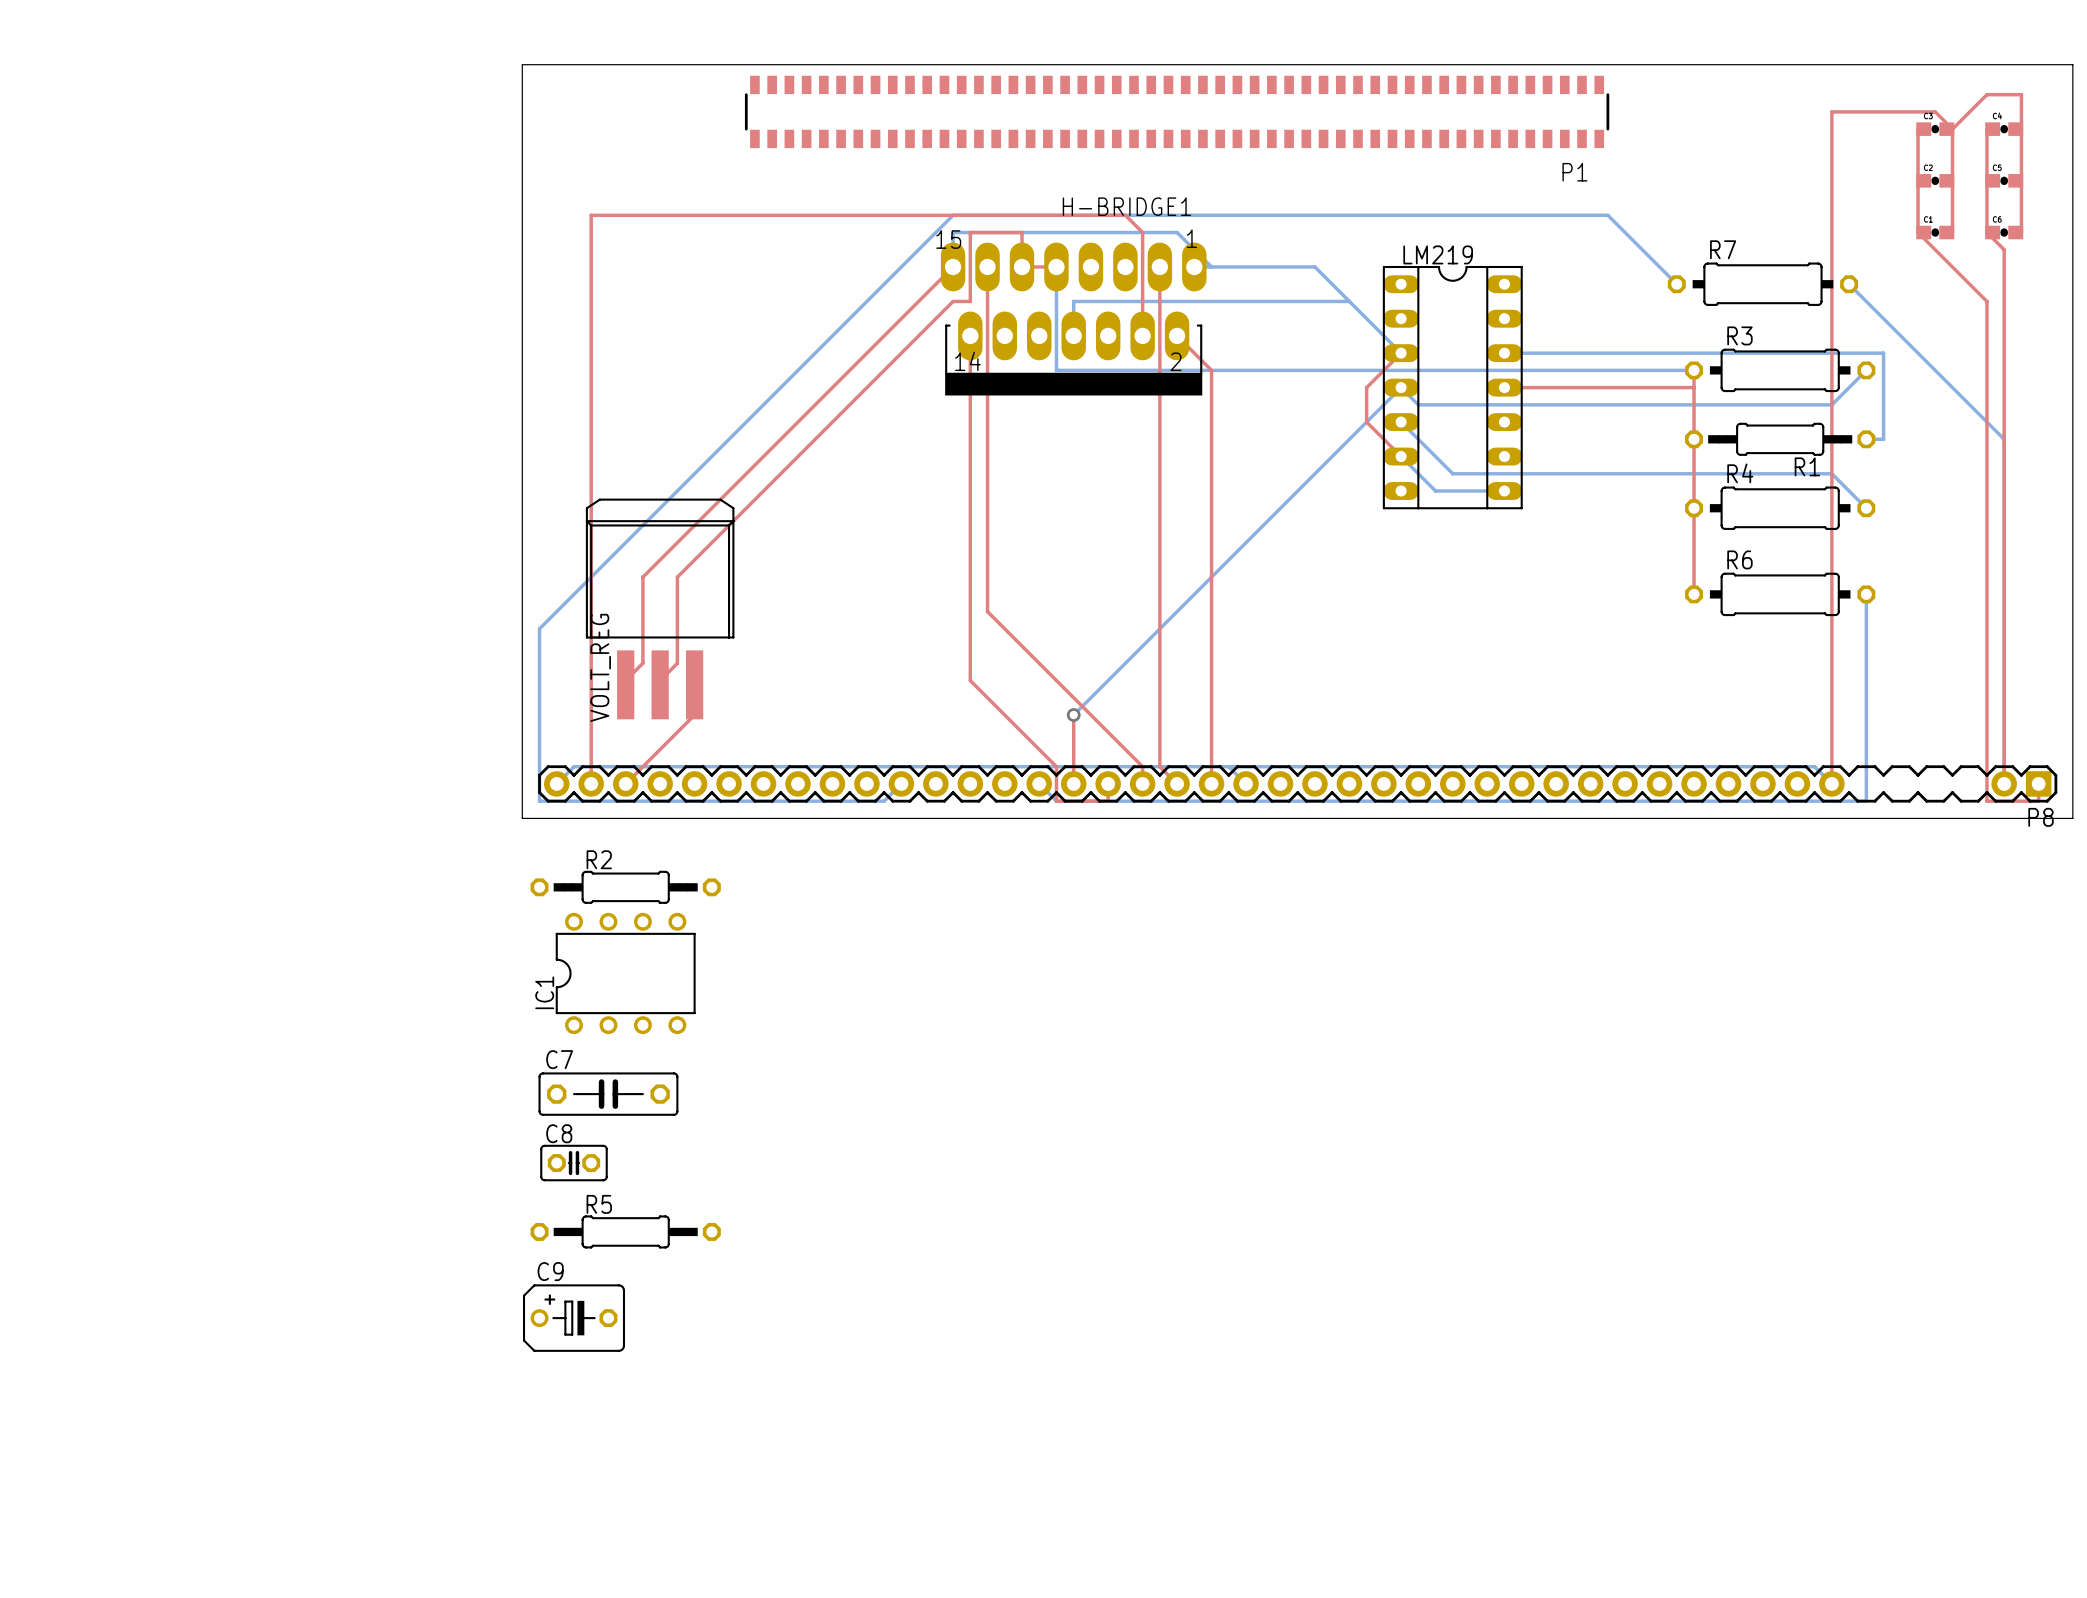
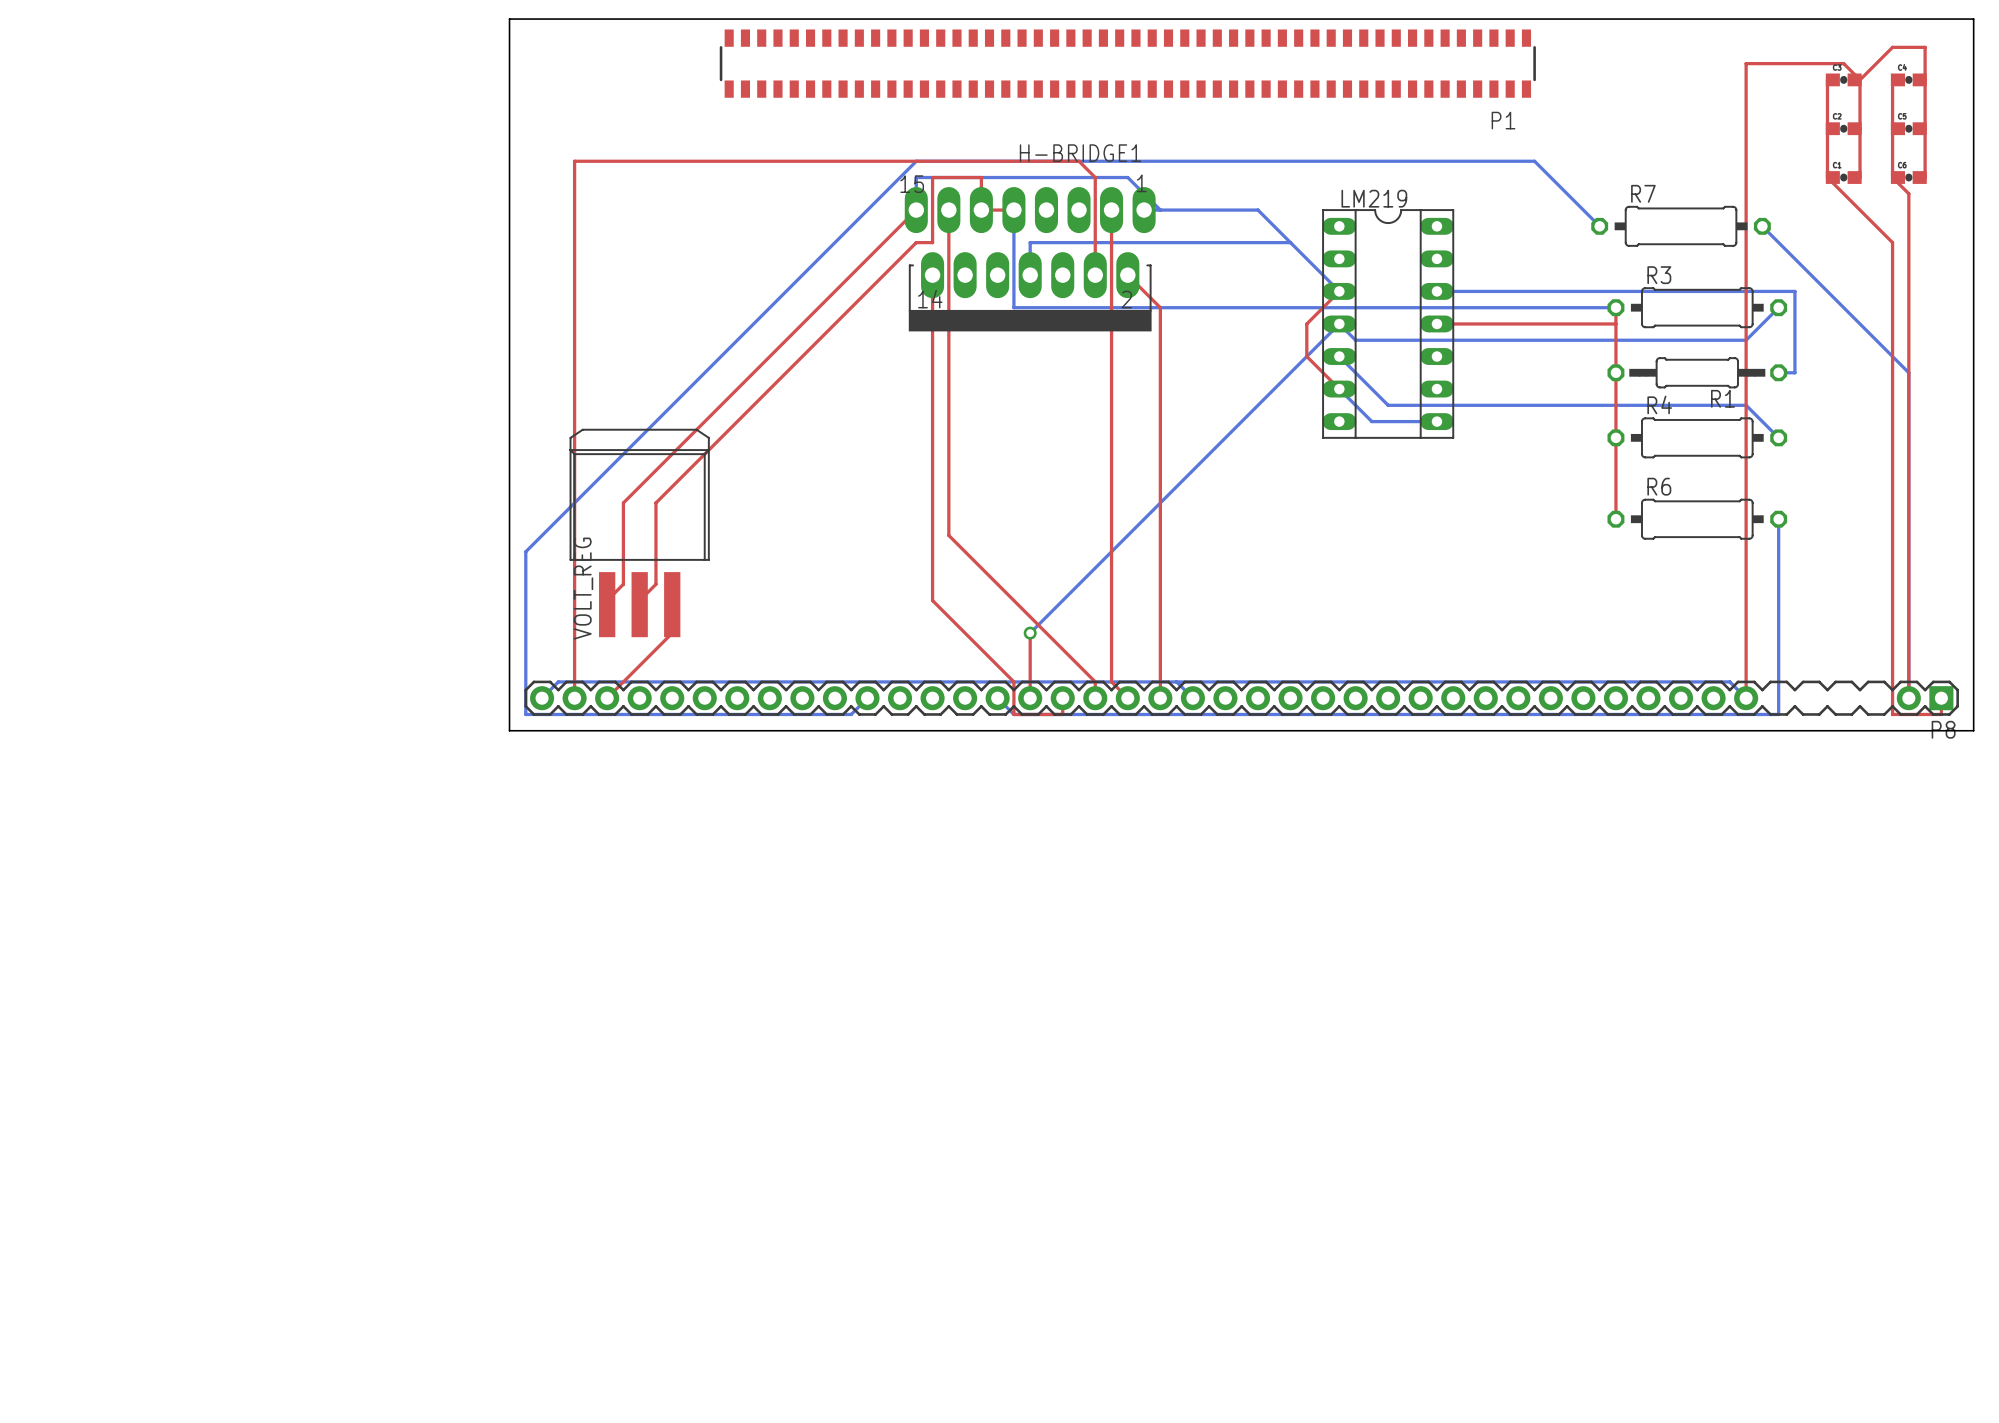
R2: (625, 887) -> none
IC1: (625, 973) -> none
C7: (608, 1094) -> none
C8: (573, 1163) -> none
R5: (625, 1231) -> none
C9: (573, 1318) -> none

